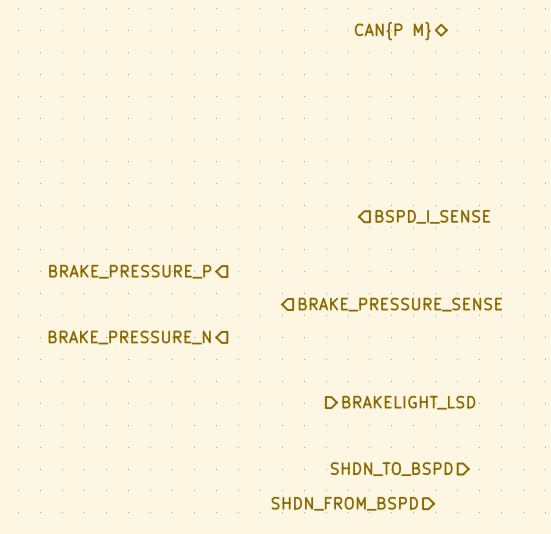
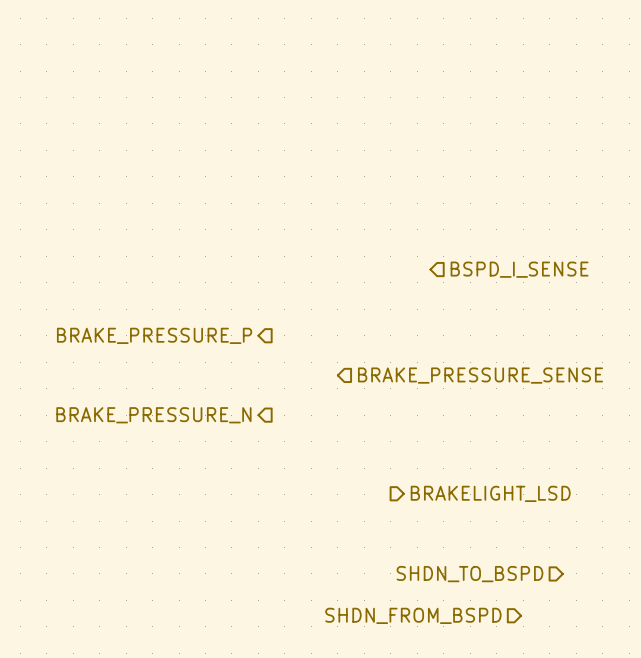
hierarchical label: CAN{P M} (392, 31) -> none

